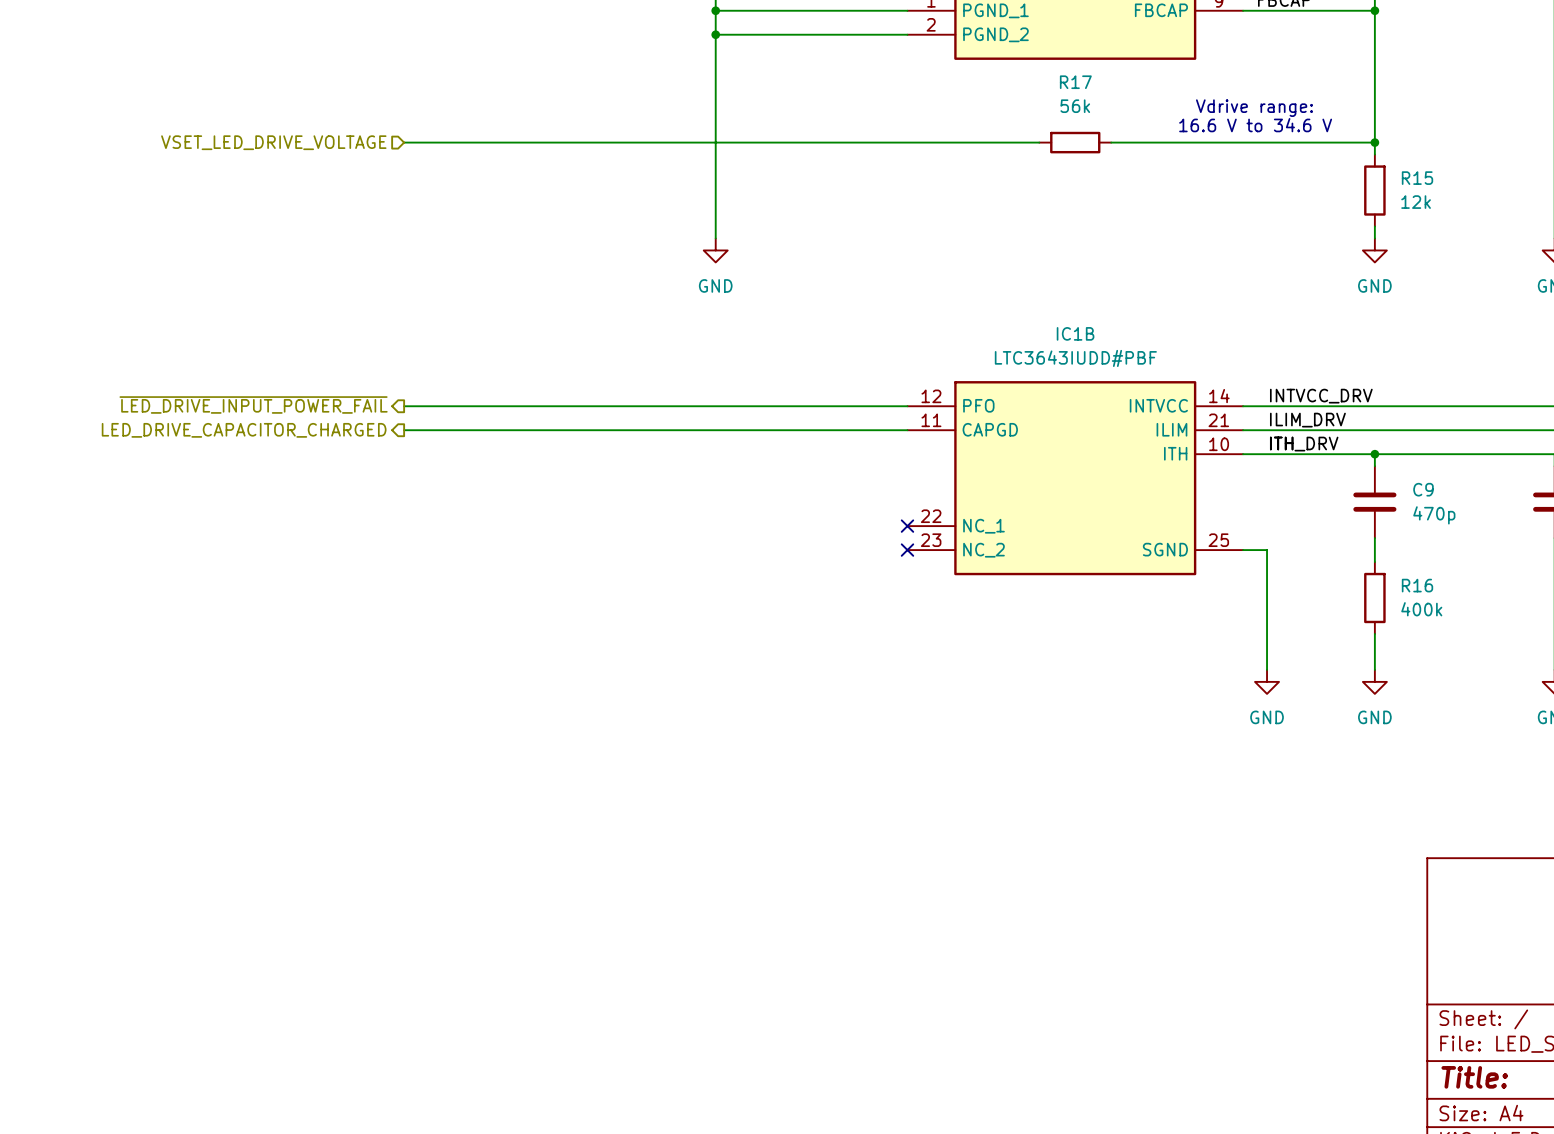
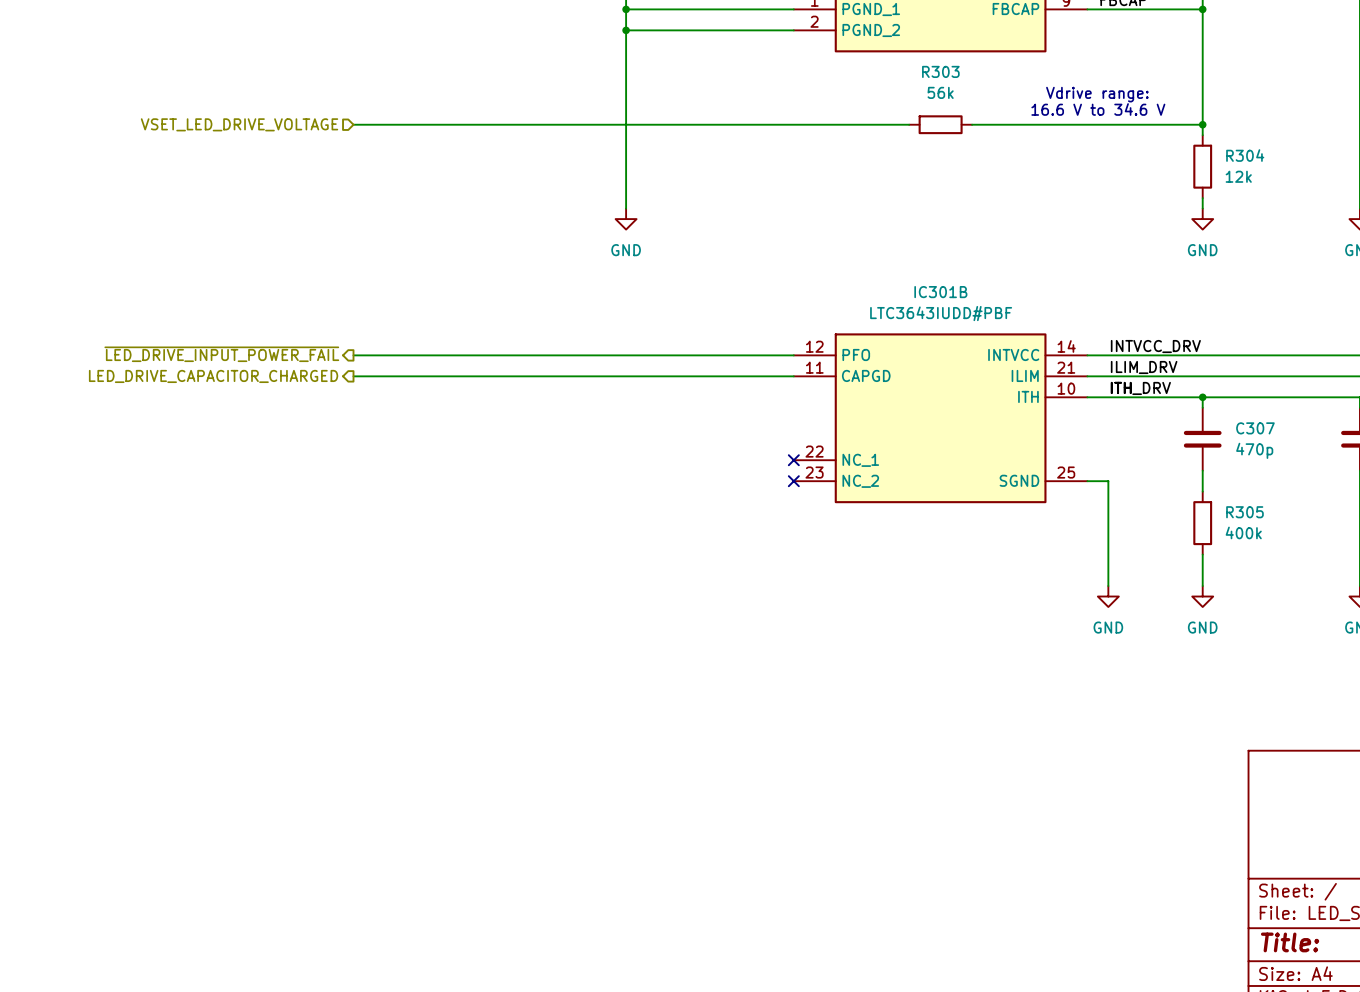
R17 name: R17 (1075, 82) -> R303 (940, 71)
R15 name: R15 (1417, 178) -> R304 (1245, 155)
IC1B name: IC1B (1075, 333) -> IC301B (940, 292)
C9 name: C9 (1423, 489) -> C307 (1255, 428)
R16 name: R16 (1417, 585) -> R305 (1244, 512)

